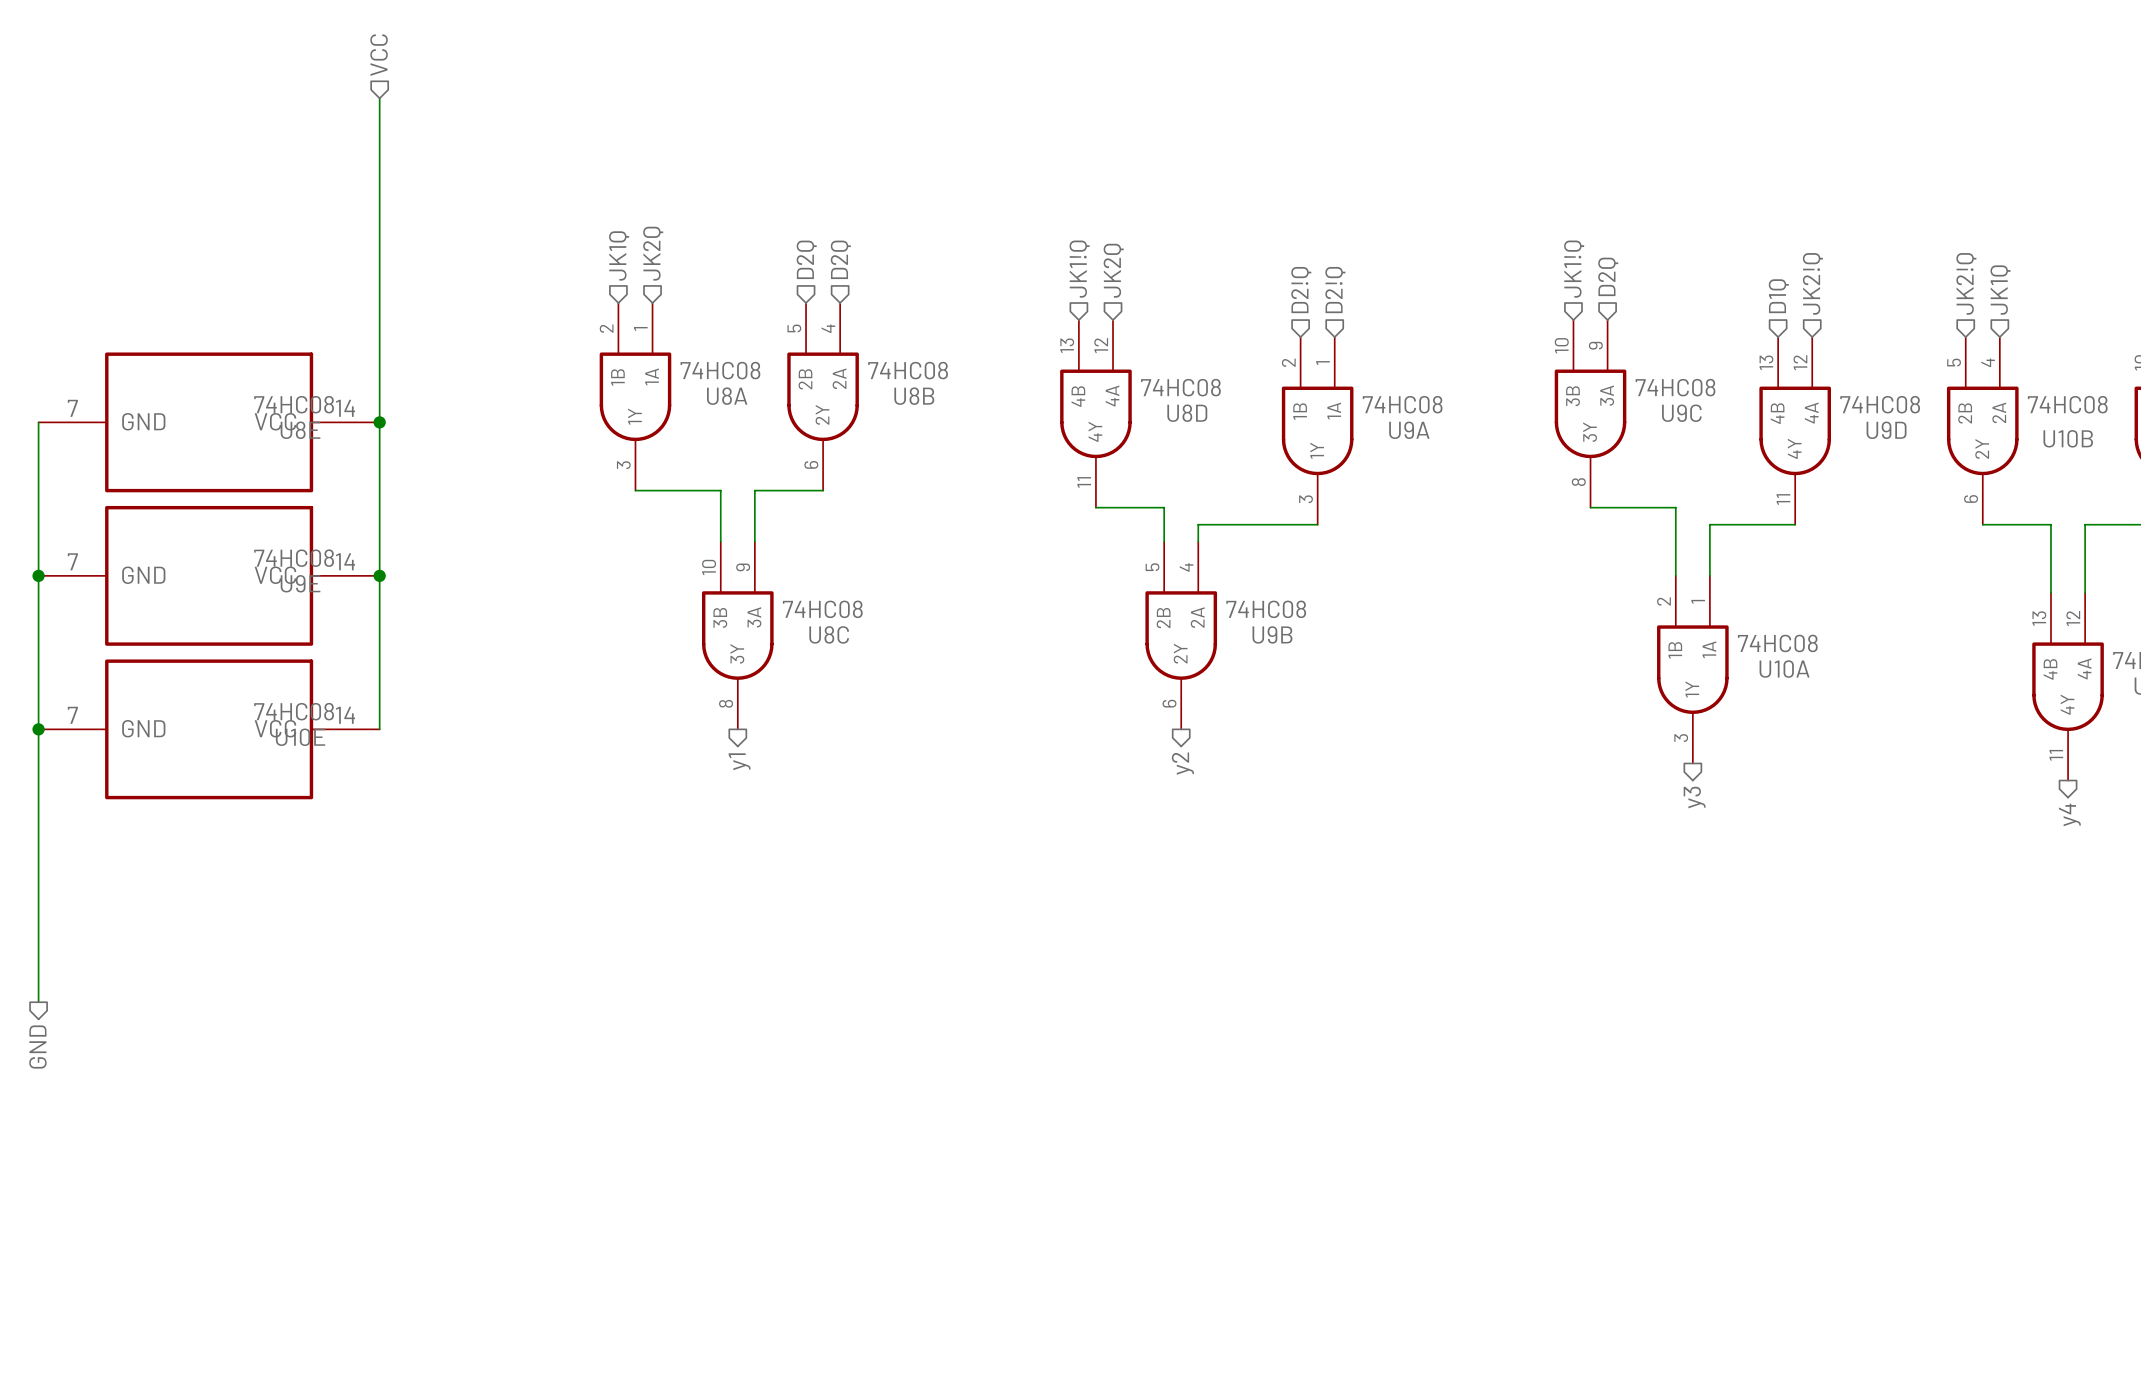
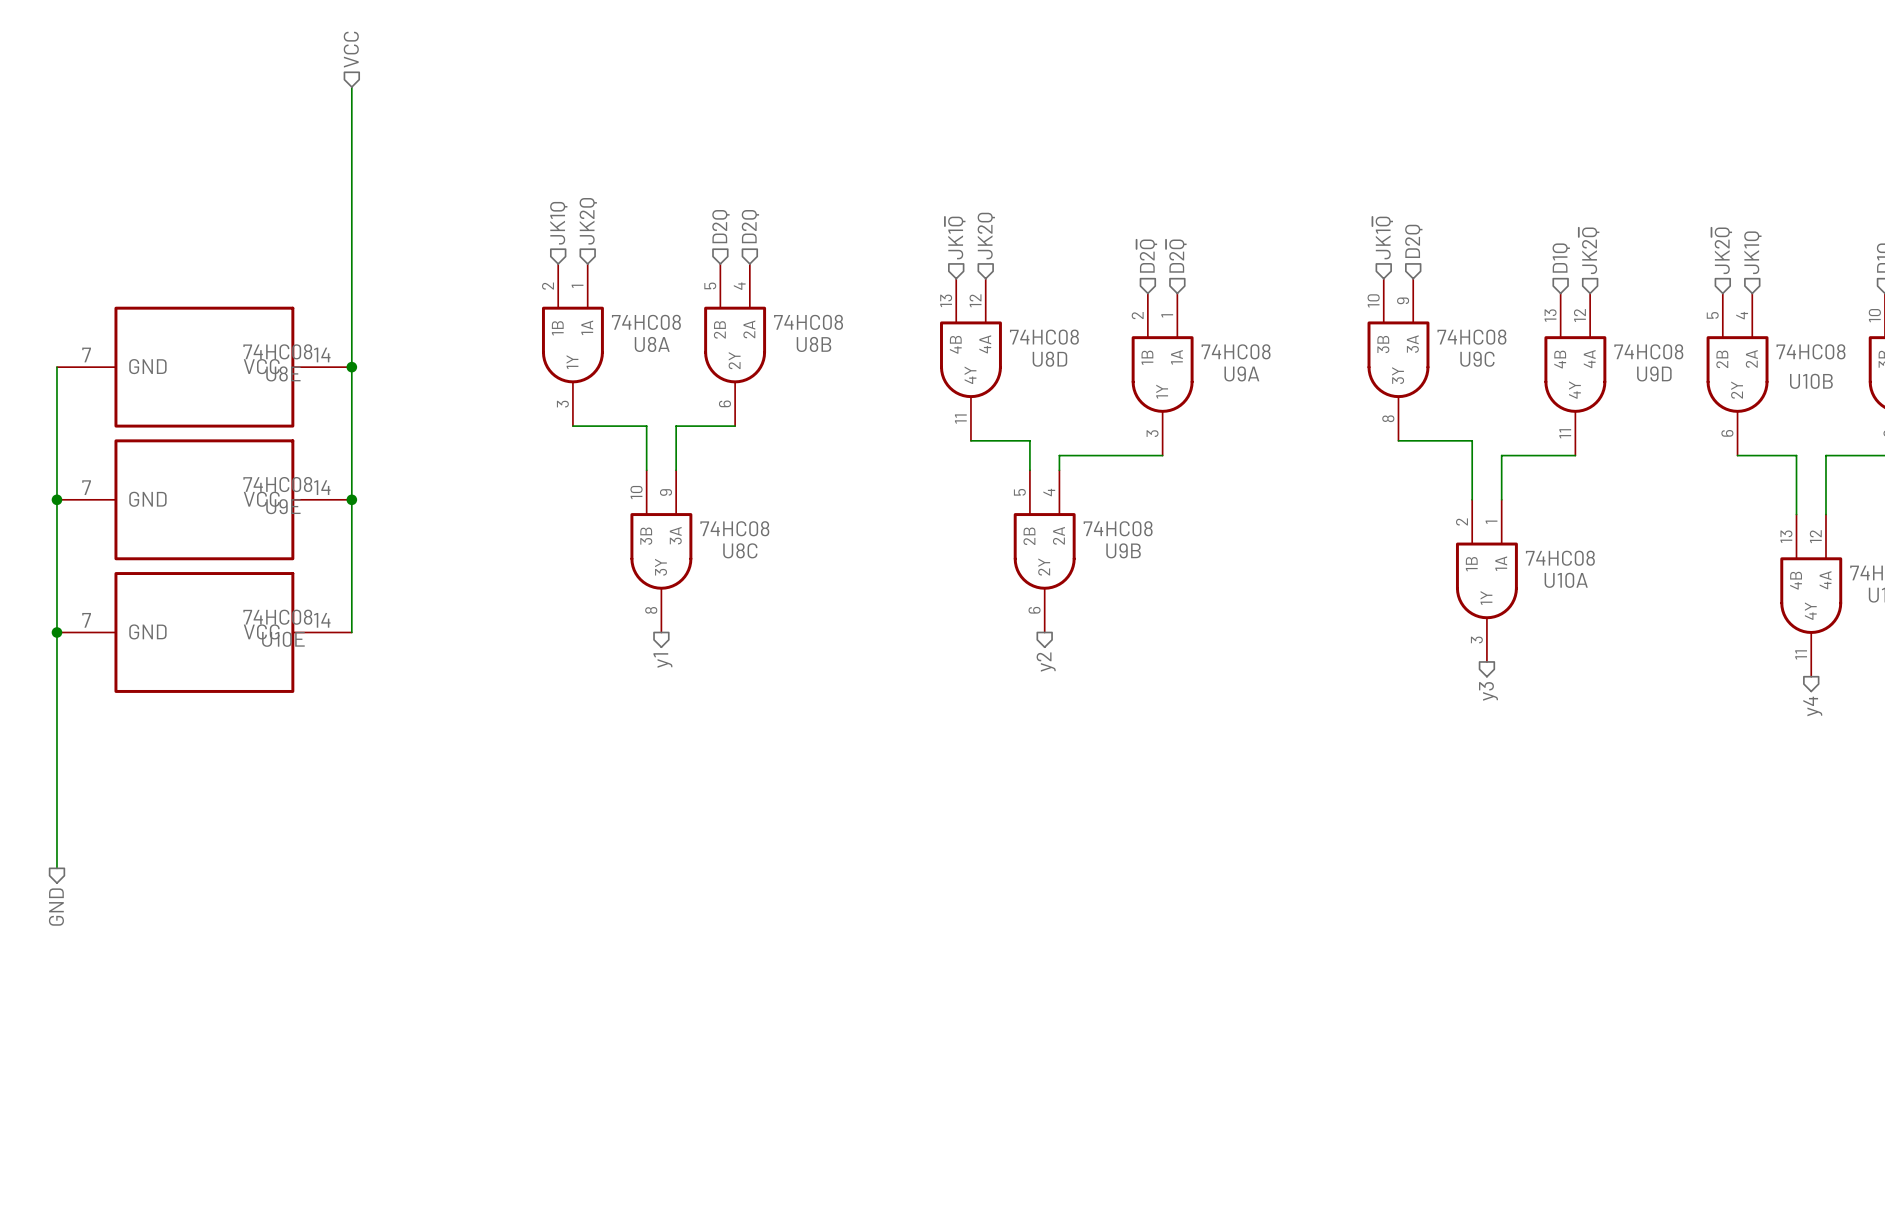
hierarchical label: JK1!Q (1079, 269) -> JK1~{Q} (955, 238)
hierarchical label: JK1!Q (1574, 269) -> JK1~{Q} (1382, 238)
hierarchical label: JK2!Q (1812, 283) -> JK2~{Q} (1589, 250)
hierarchical label: JK2!Q (1966, 283) -> JK2~{Q} (1721, 250)
hierarchical label: D2!Q (1301, 290) -> D2~{Q} (1146, 256)
hierarchical label: D2!Q (1335, 290) -> D2~{Q} (1176, 256)

